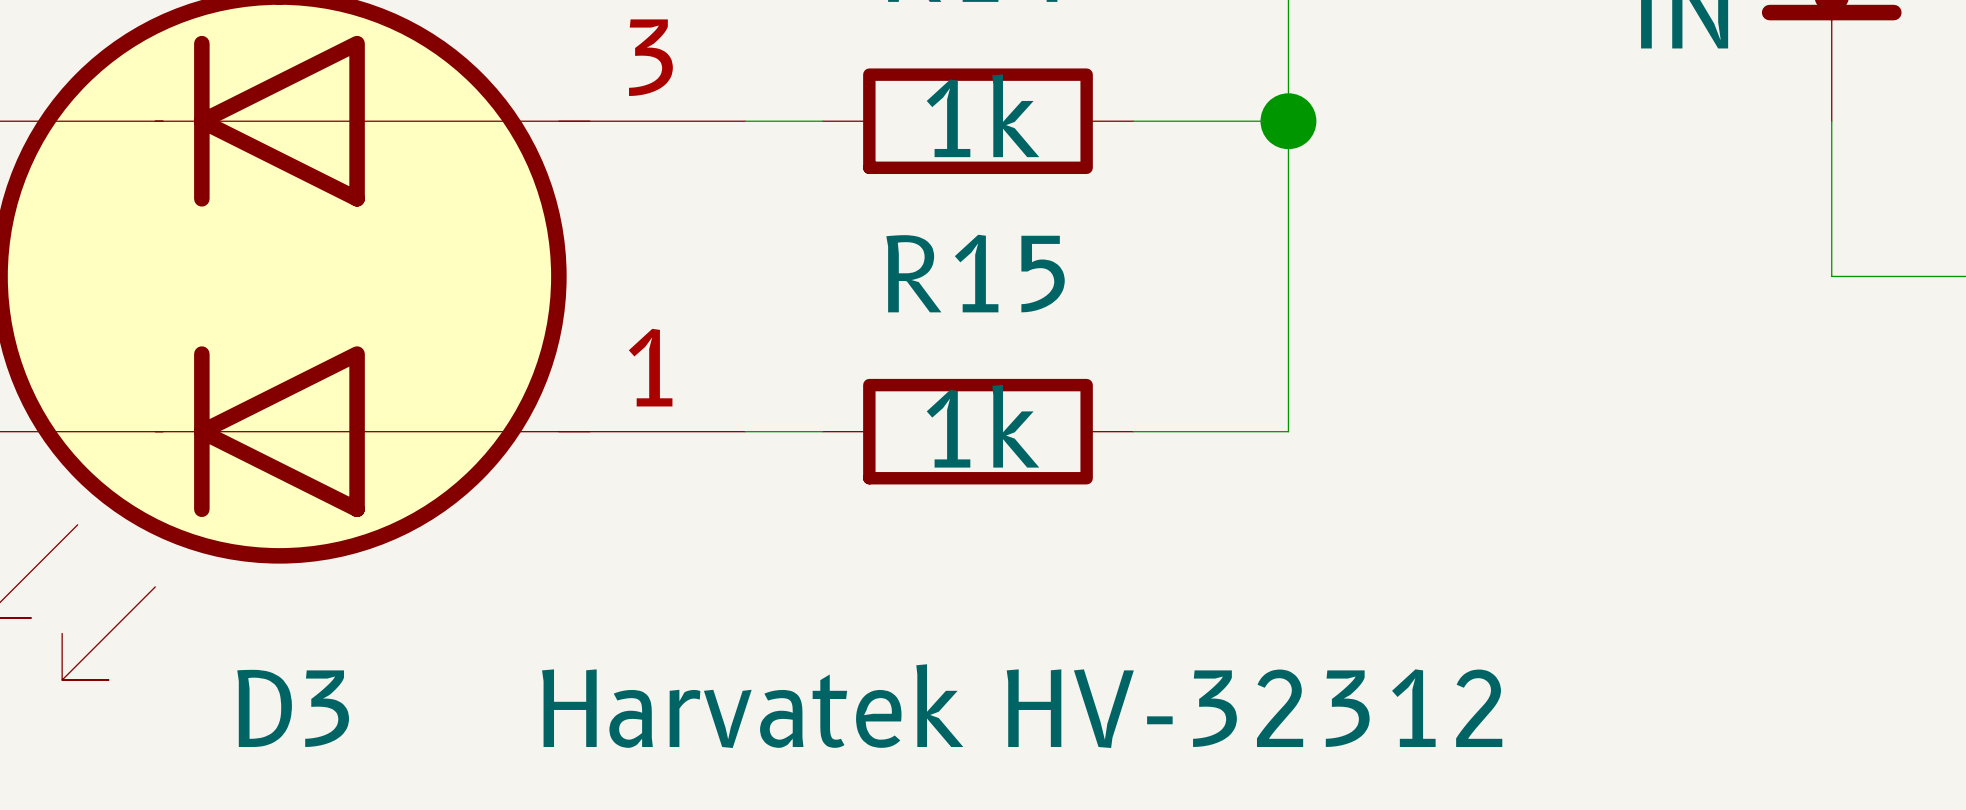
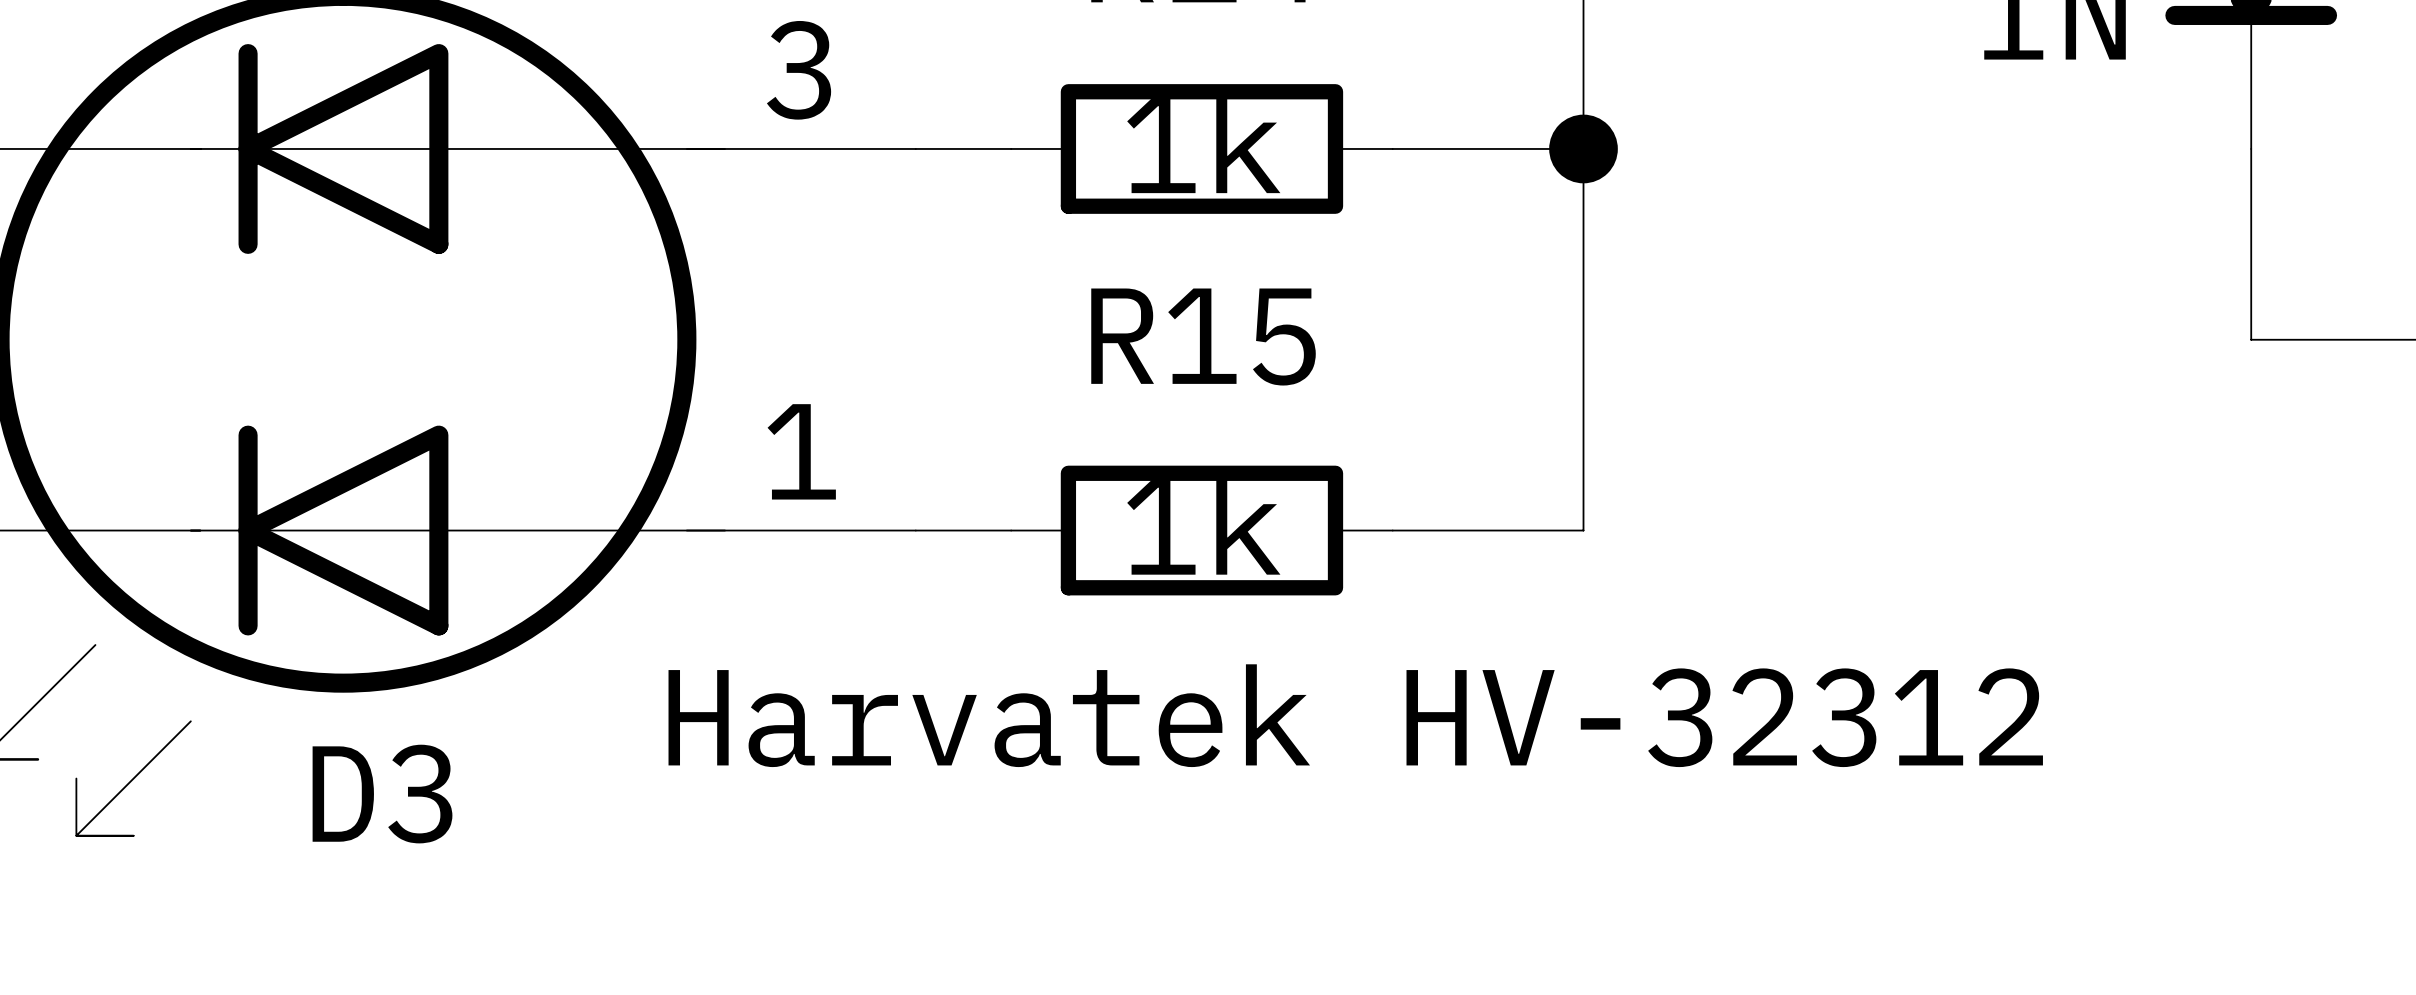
D3 value position: Harvatek HV-32312 (1022, 706) -> Harvatek HV-32312 (1355, 715)
D3 name position: D3 (293, 708) -> D3 (382, 794)

